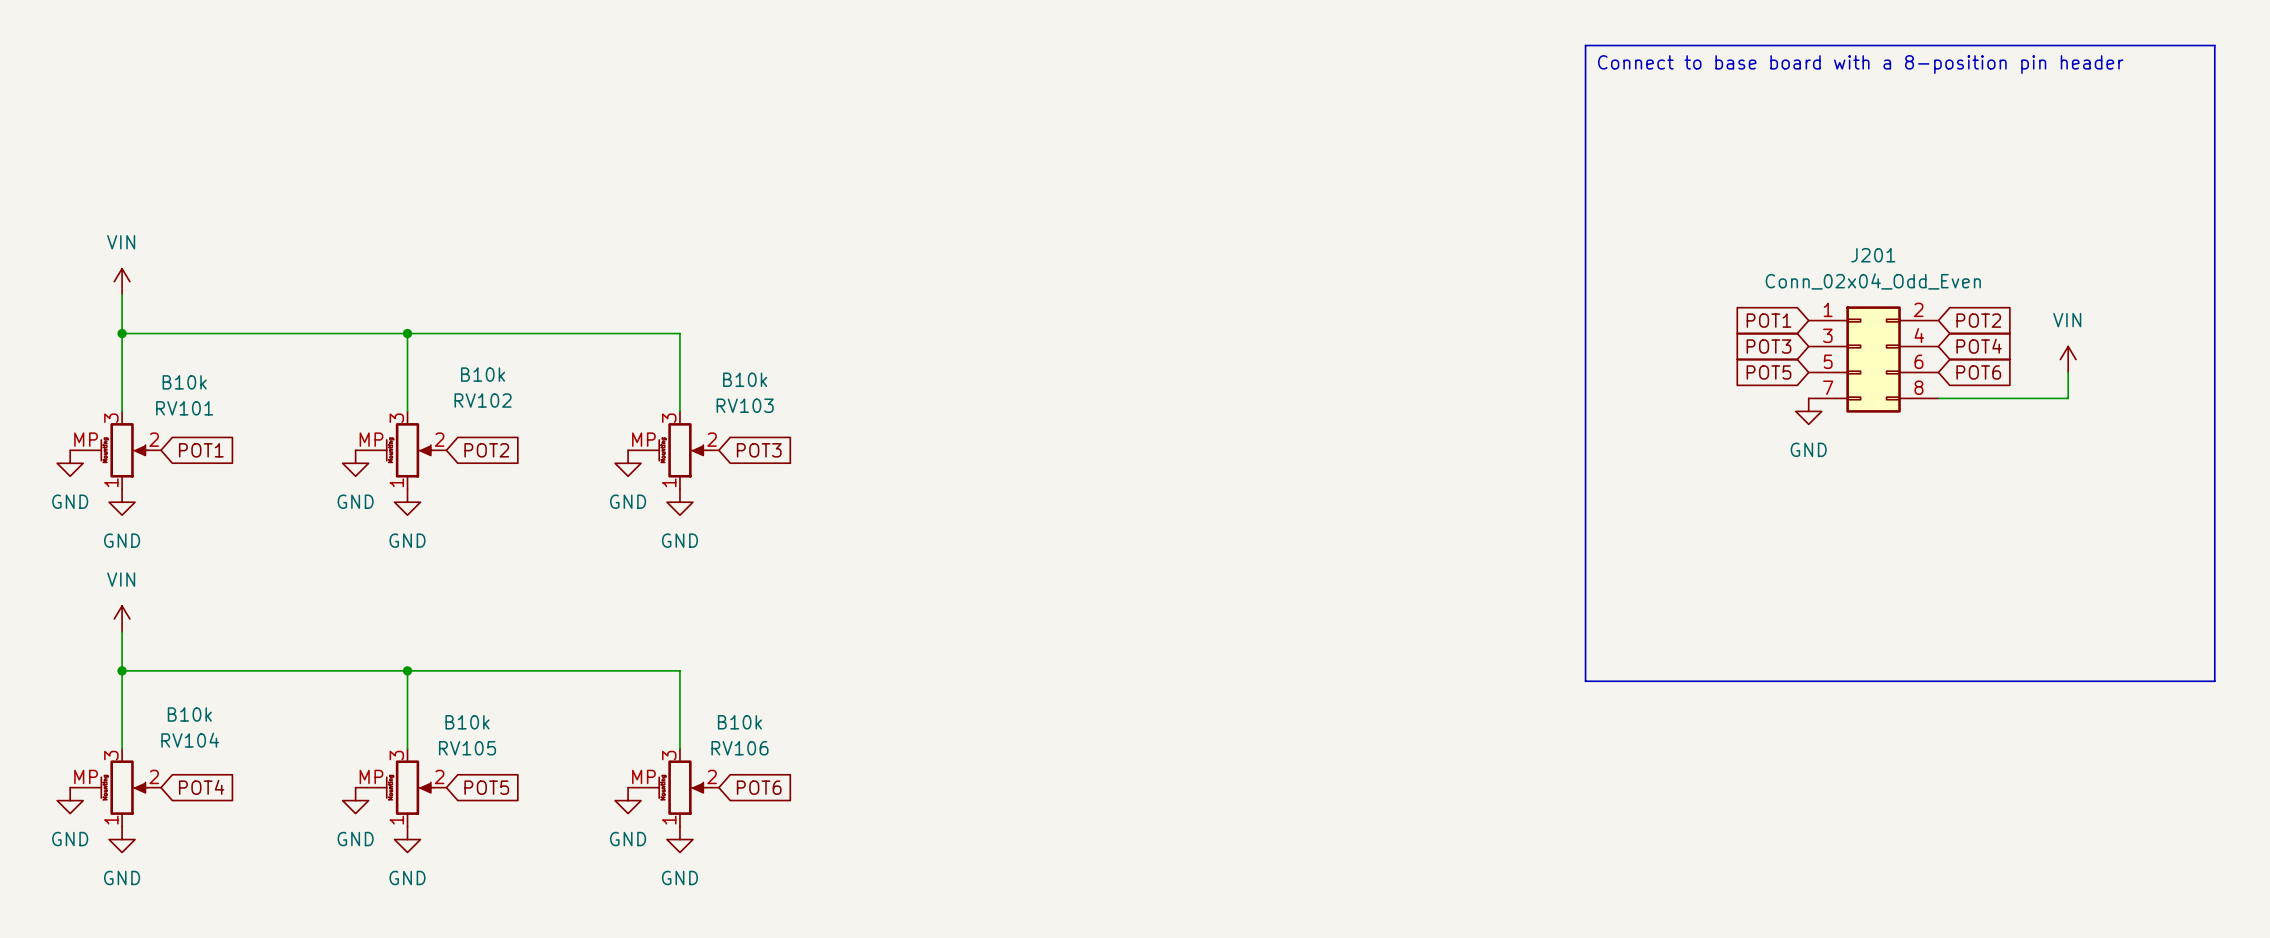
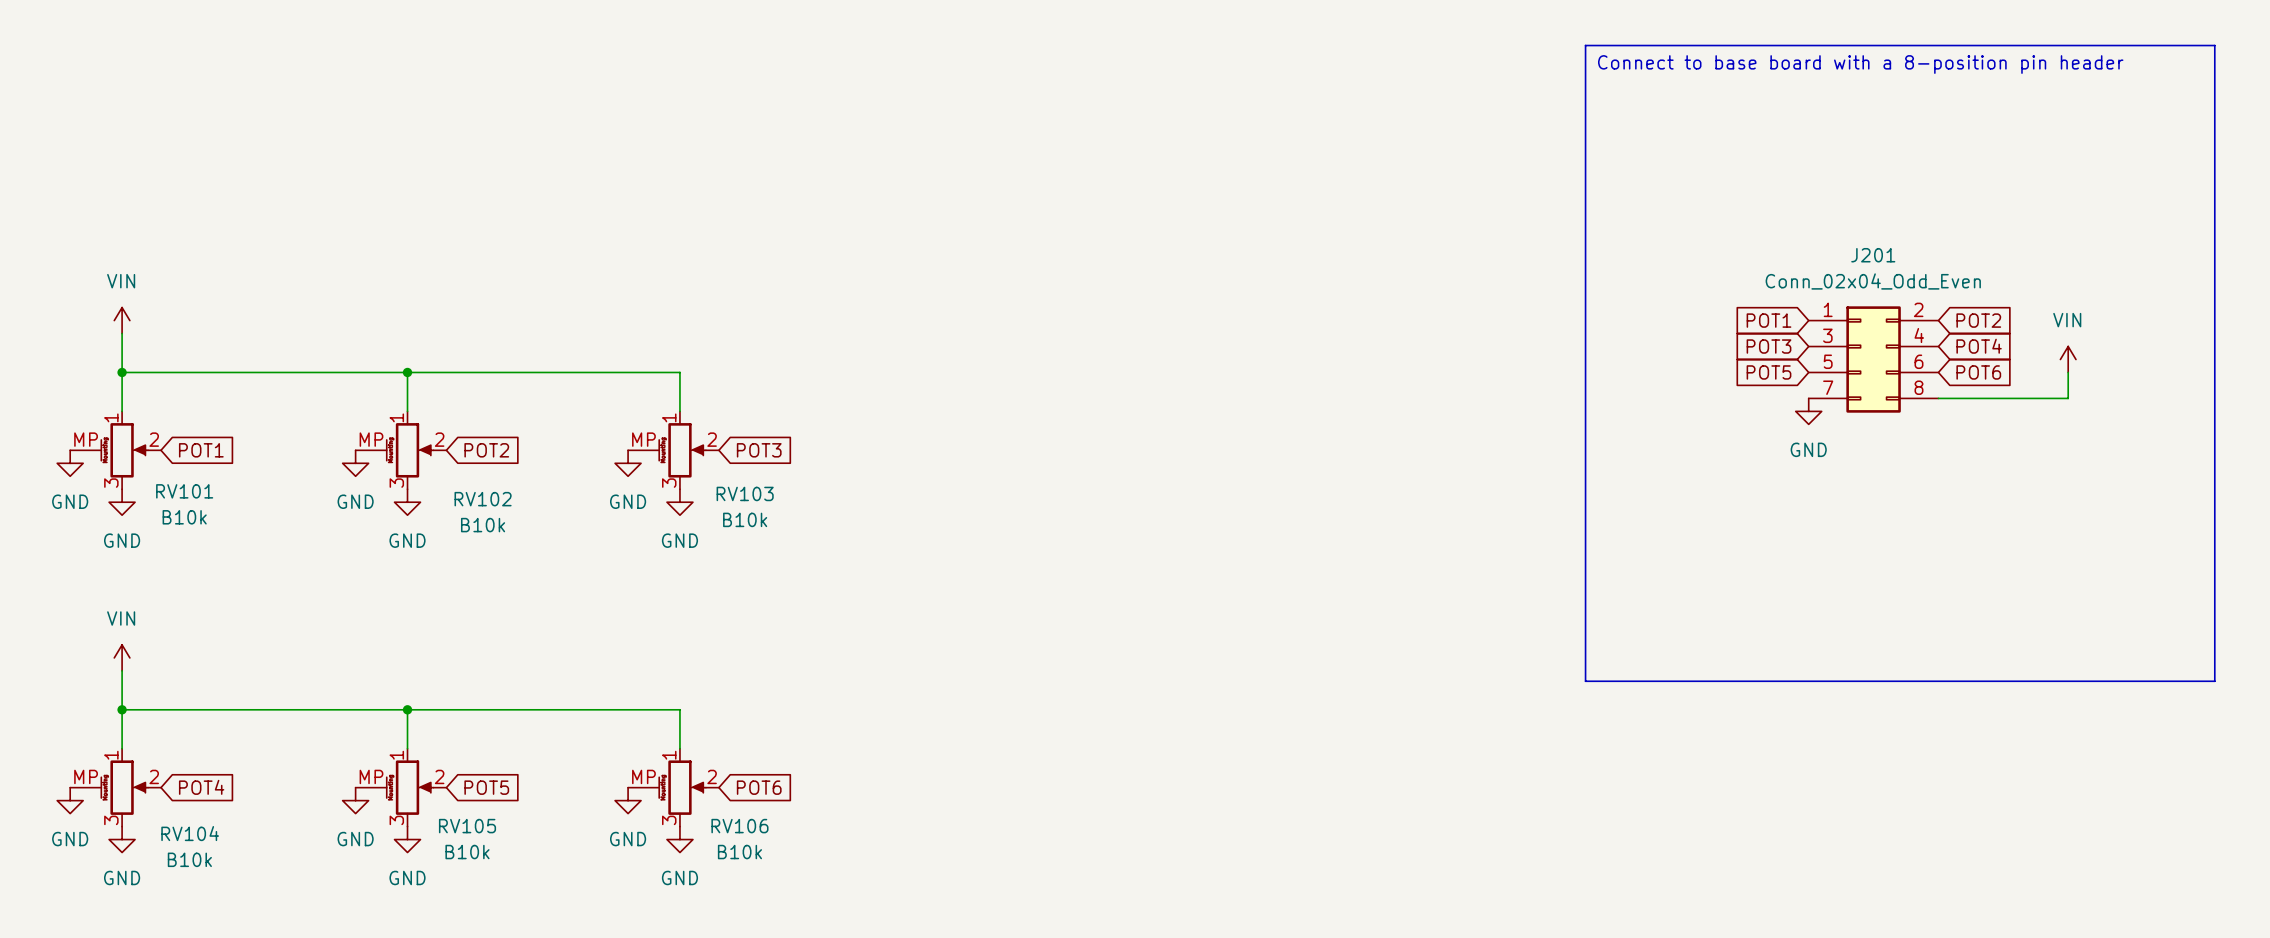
power symbol position: VIN (122, 281) -> VIN (122, 320)
wire: (122, 294) (122, 333) (679, 333) (679, 372) -> (122, 372) (679, 372)
junction position: (122, 333) -> (122, 372)
wire: (407, 333) (407, 372) -> none
junction position: (407, 333) -> (407, 372)
RV101 flip: as is (124, 450) -> up-down (124, 450)
RV102 flip: as is (409, 450) -> up-down (409, 450)
RV103 flip: as is (682, 450) -> up-down (682, 450)
power symbol position: VIN (122, 618) -> VIN (122, 657)
wire: (122, 631) (122, 670) (679, 670) (679, 709) -> (122, 709) (679, 709)
junction position: (122, 670) -> (122, 709)
wire: (407, 670) (407, 709) -> none
junction position: (407, 670) -> (407, 709)
RV104 flip: as is (124, 787) -> up-down (124, 787)
RV105 flip: as is (409, 787) -> up-down (409, 787)
RV106 flip: as is (682, 787) -> up-down (682, 787)

